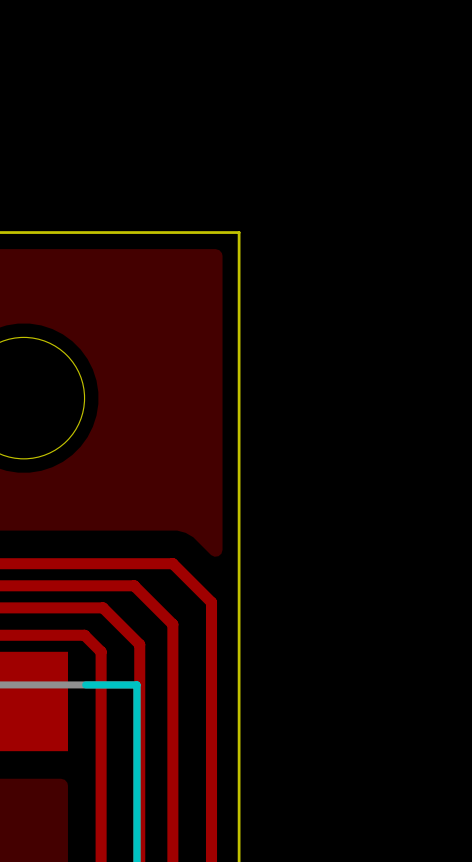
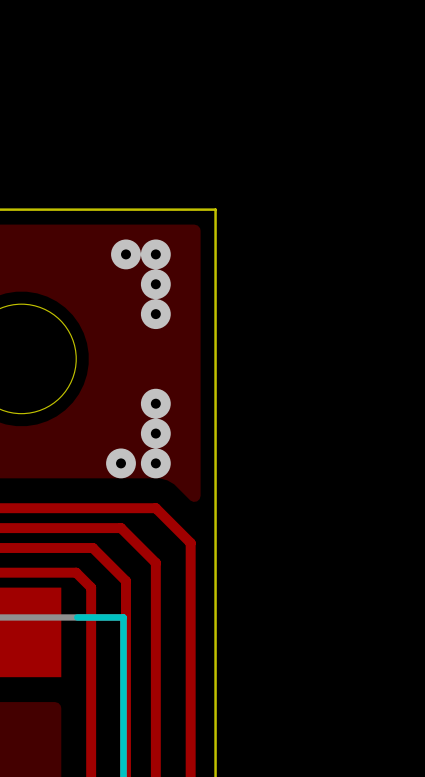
via: none -> (125, 254)
via: none -> (155, 254)
via: none -> (155, 284)
via: none -> (155, 314)
via: none -> (155, 403)
via: none -> (155, 433)
via: none -> (121, 463)
via: none -> (155, 463)

